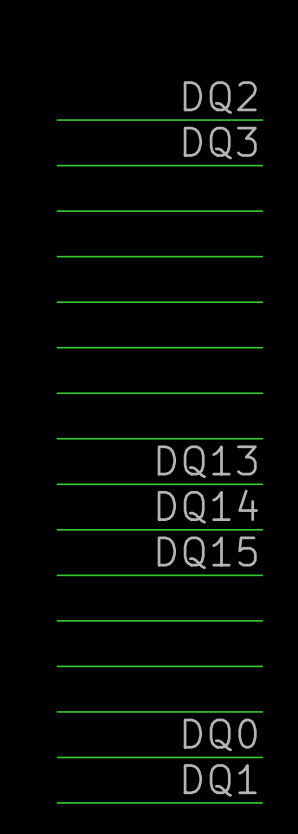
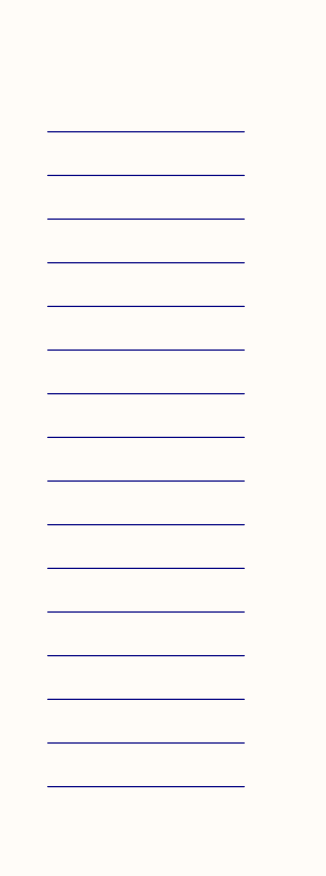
label: DQ2 (220, 97) -> none
label: DQ3 (220, 143) -> none
label: DQ13 (207, 461) -> none
label: DQ14 (207, 506) -> none
label: DQ15 (207, 552) -> none
label: DQ0 (220, 734) -> none
label: DQ1 (220, 780) -> none

